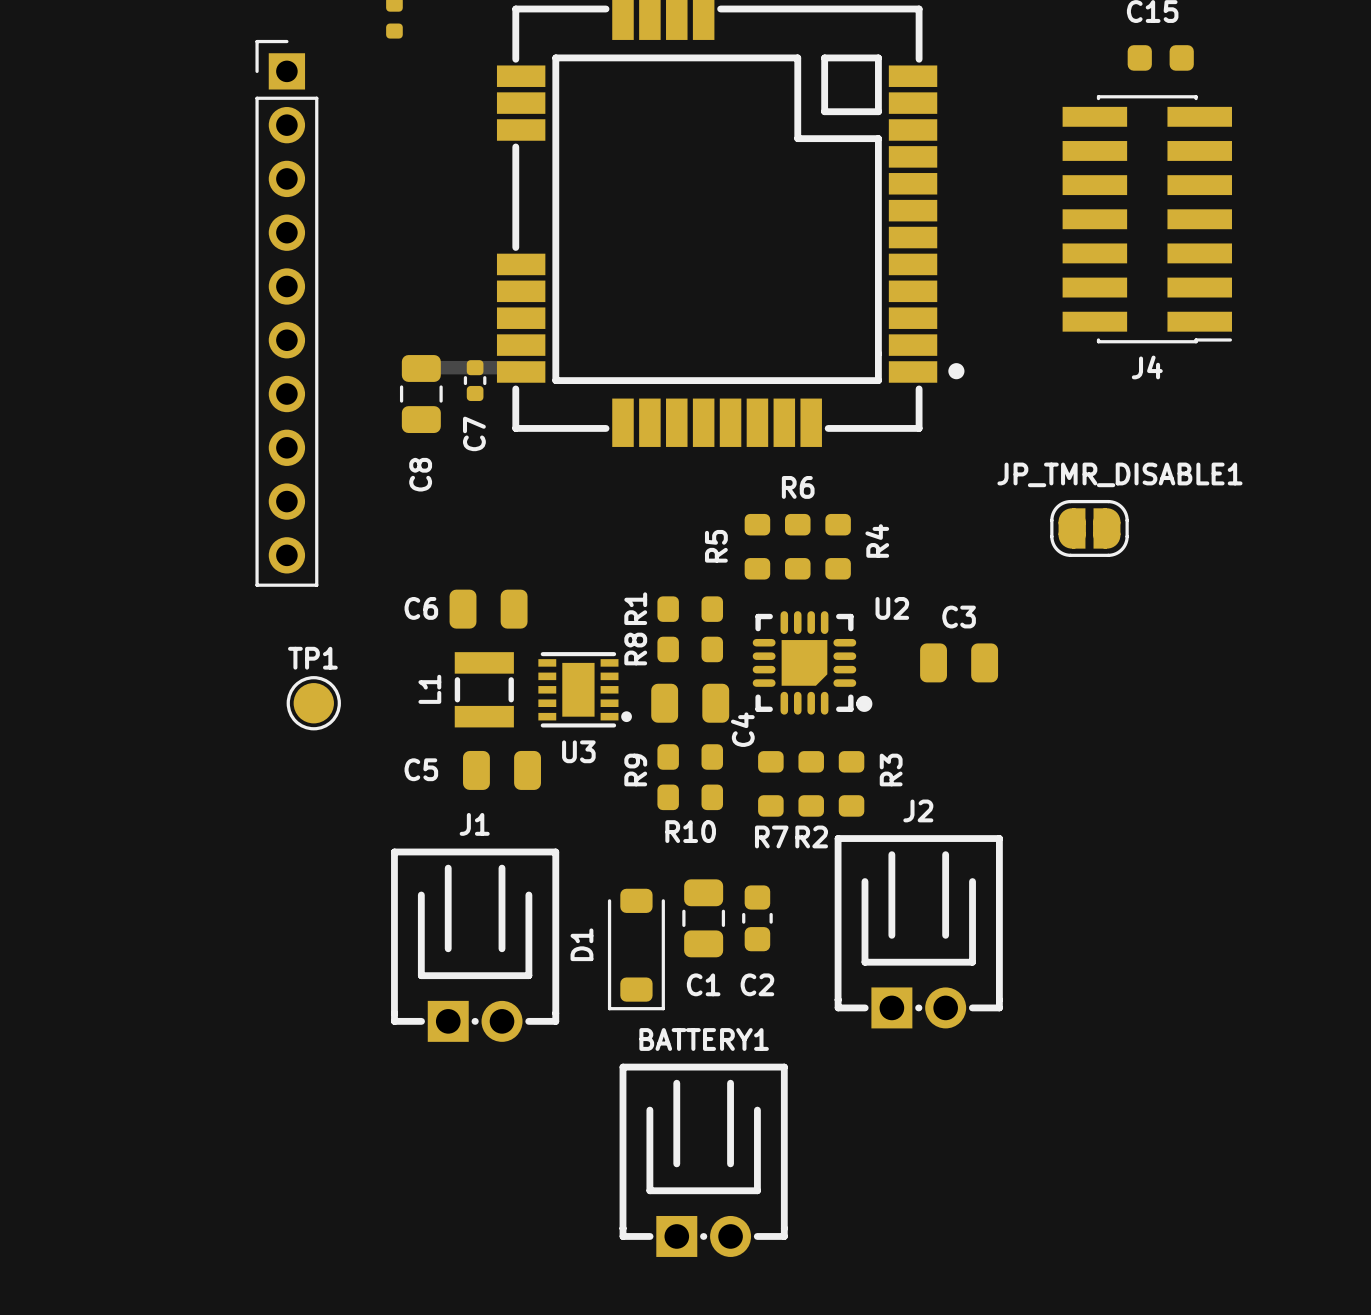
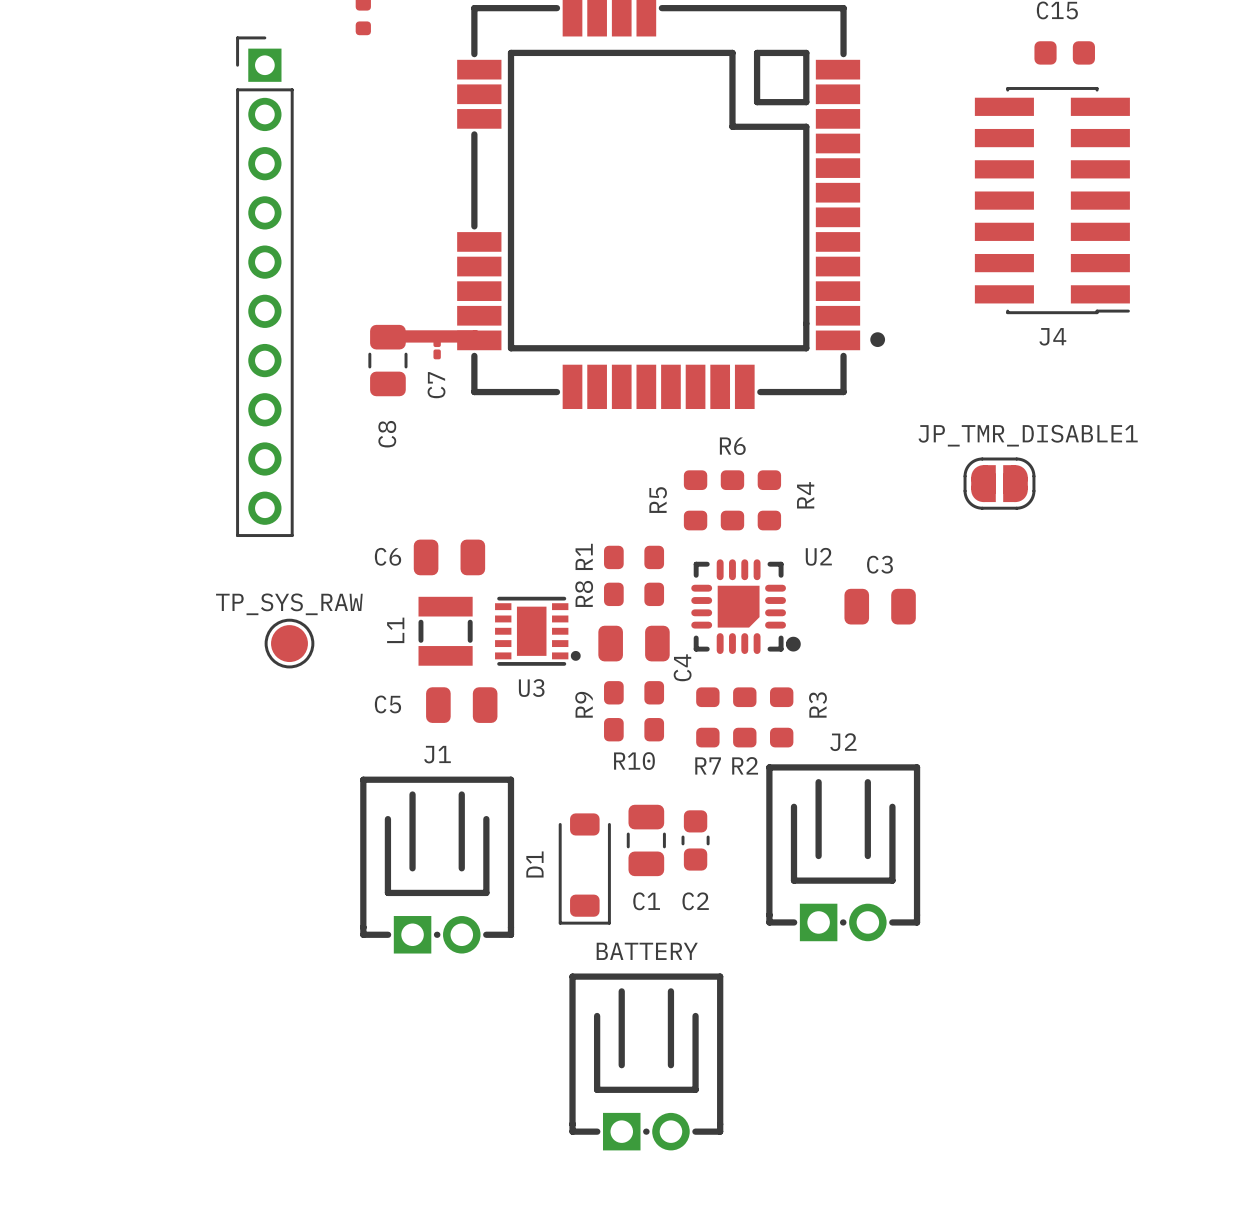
C7 footprint: [463, 360, 487, 402] -> [433, 337, 441, 360]
TP1 name: TP1 (312, 658) -> TP_SYS_RAW (289, 604)
BATTERY1 name: BATTERY1 (704, 1039) -> BATTERY (647, 951)

